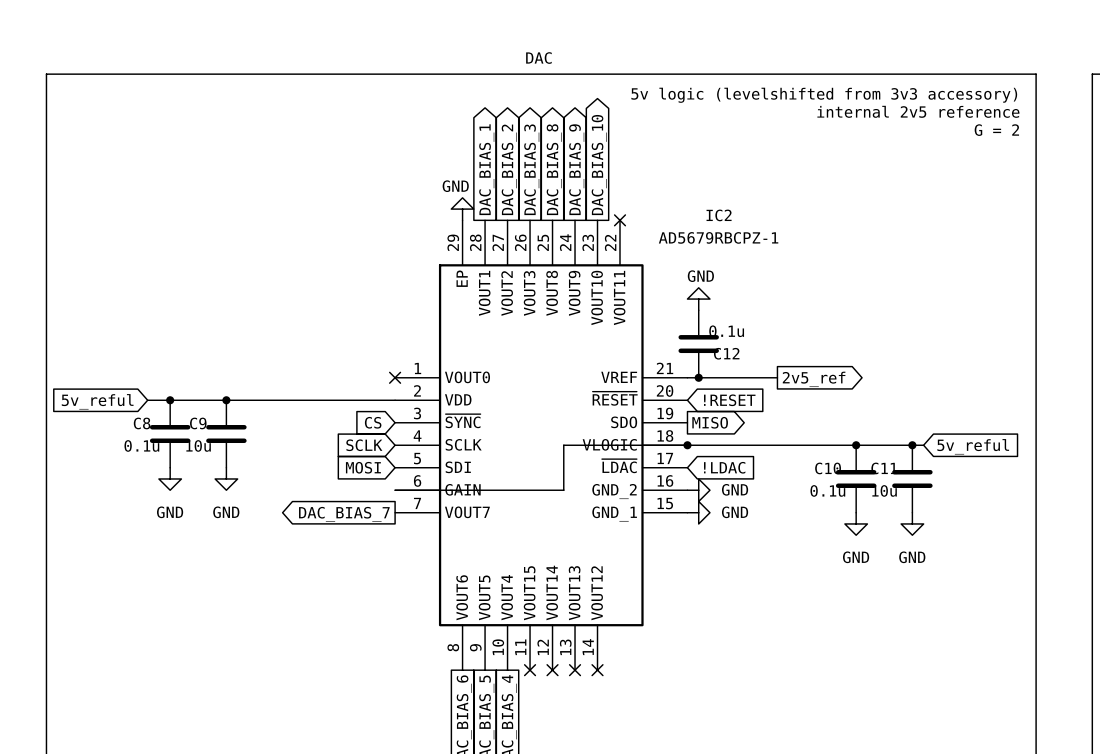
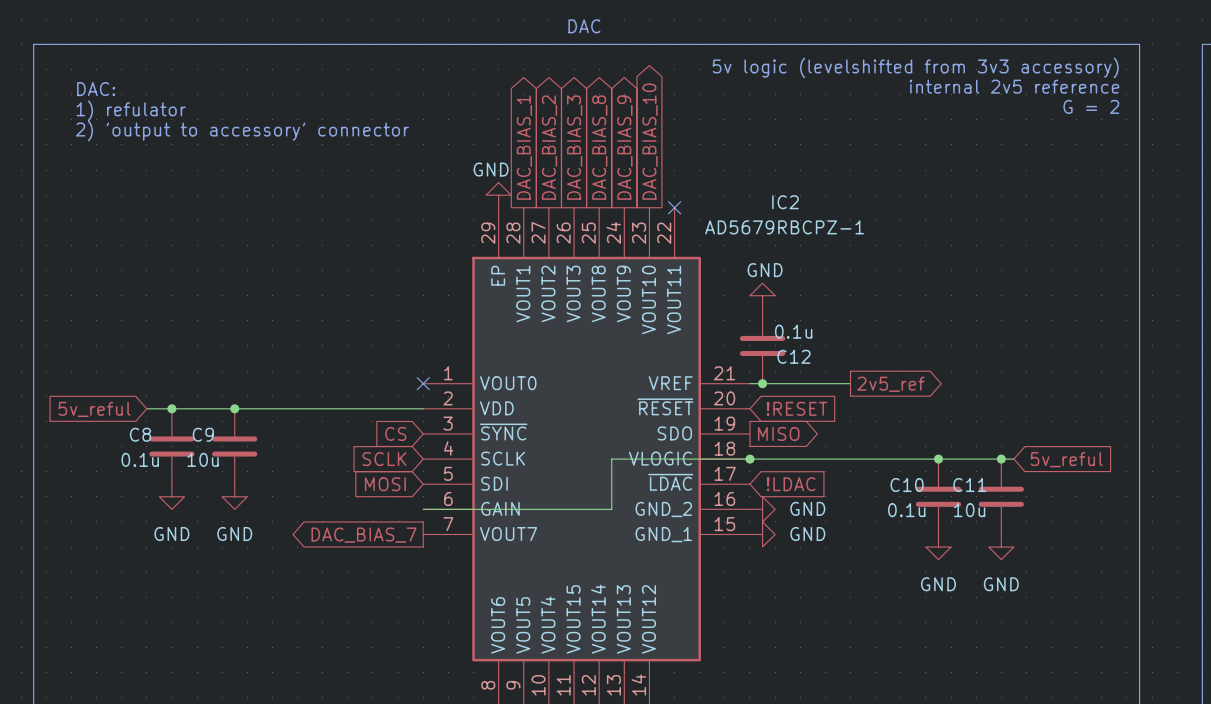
text: none -> DAC: (96, 89)
text: none -> 1) refulator (131, 110)
text: none -> 2) 'output to accessory' connector (242, 131)

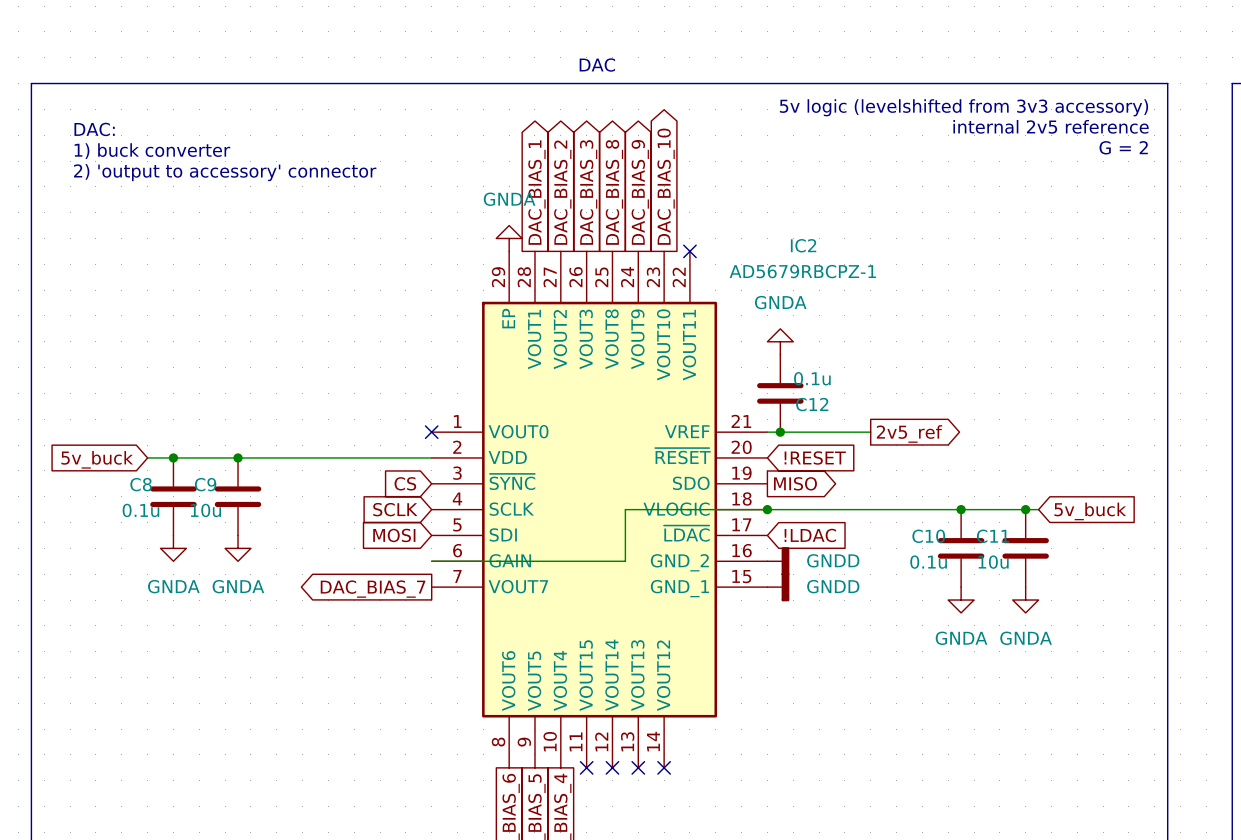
text: 1) refulator (131, 110) -> 1) buck converter (152, 151)
power symbol: GND (498, 195) -> GNDA (509, 238)
power symbol: GND (762, 295) -> GNDA (780, 341)
global label: 5v_reful (94, 409) -> 5v_buck (97, 459)
global label: 5v_reful (1066, 459) -> 5v_buck (1090, 511)
power symbol: GND (171, 496) -> GNDA (173, 548)
power symbol: GND (234, 496) -> GNDA (238, 548)
power symbol: GND (762, 509) -> GNDD (778, 561)
power symbol: GND (762, 534) -> GNDD (778, 587)
power symbol: GND (938, 547) -> GNDA (961, 600)
power symbol: GND (1001, 547) -> GNDA (1025, 600)

